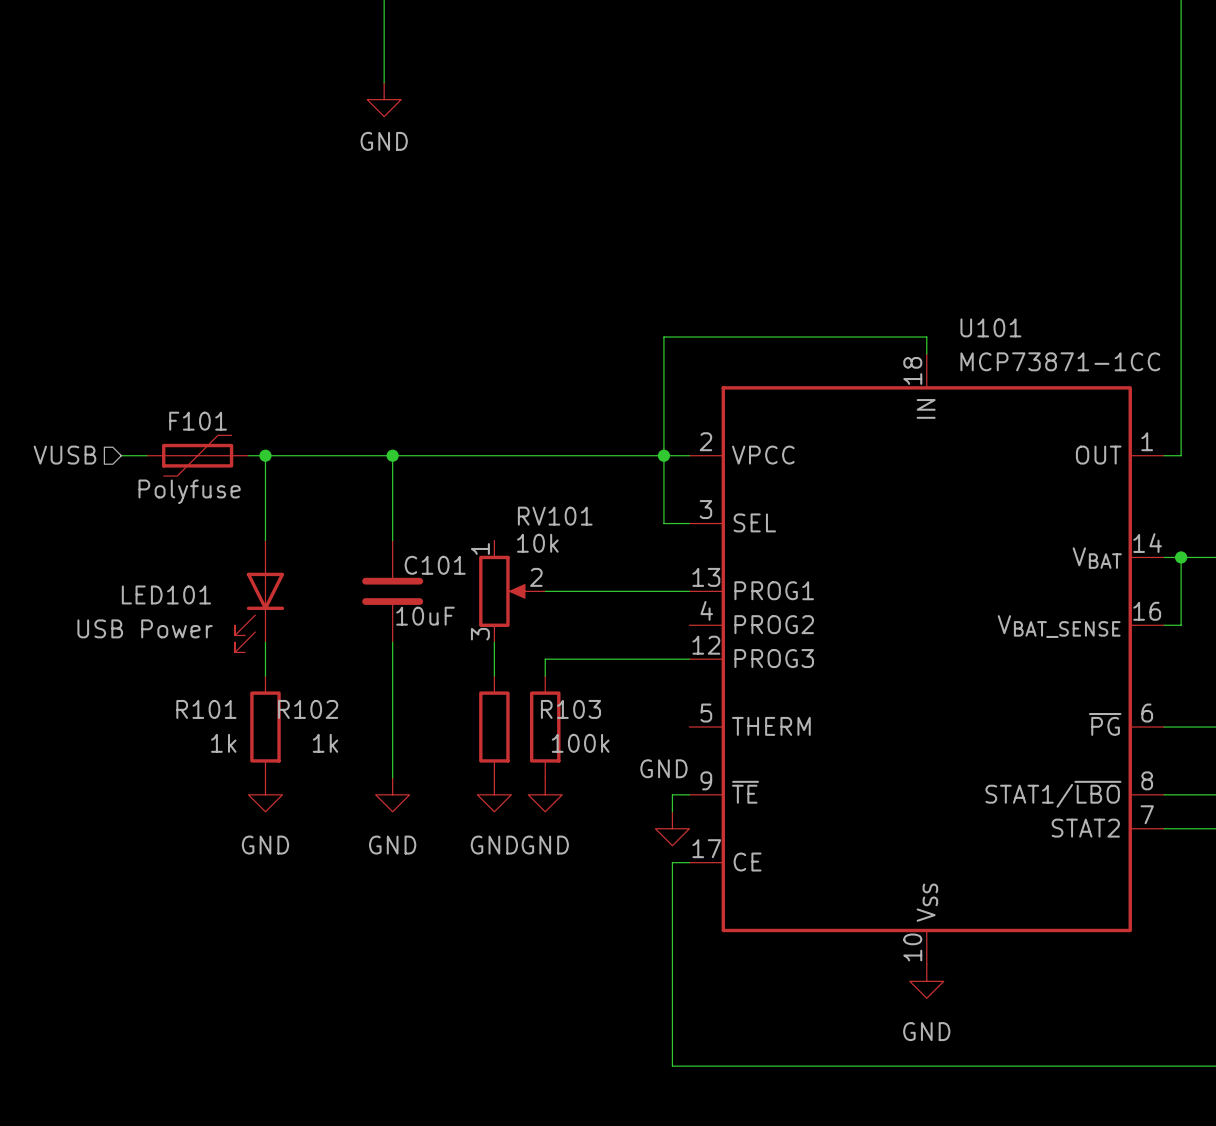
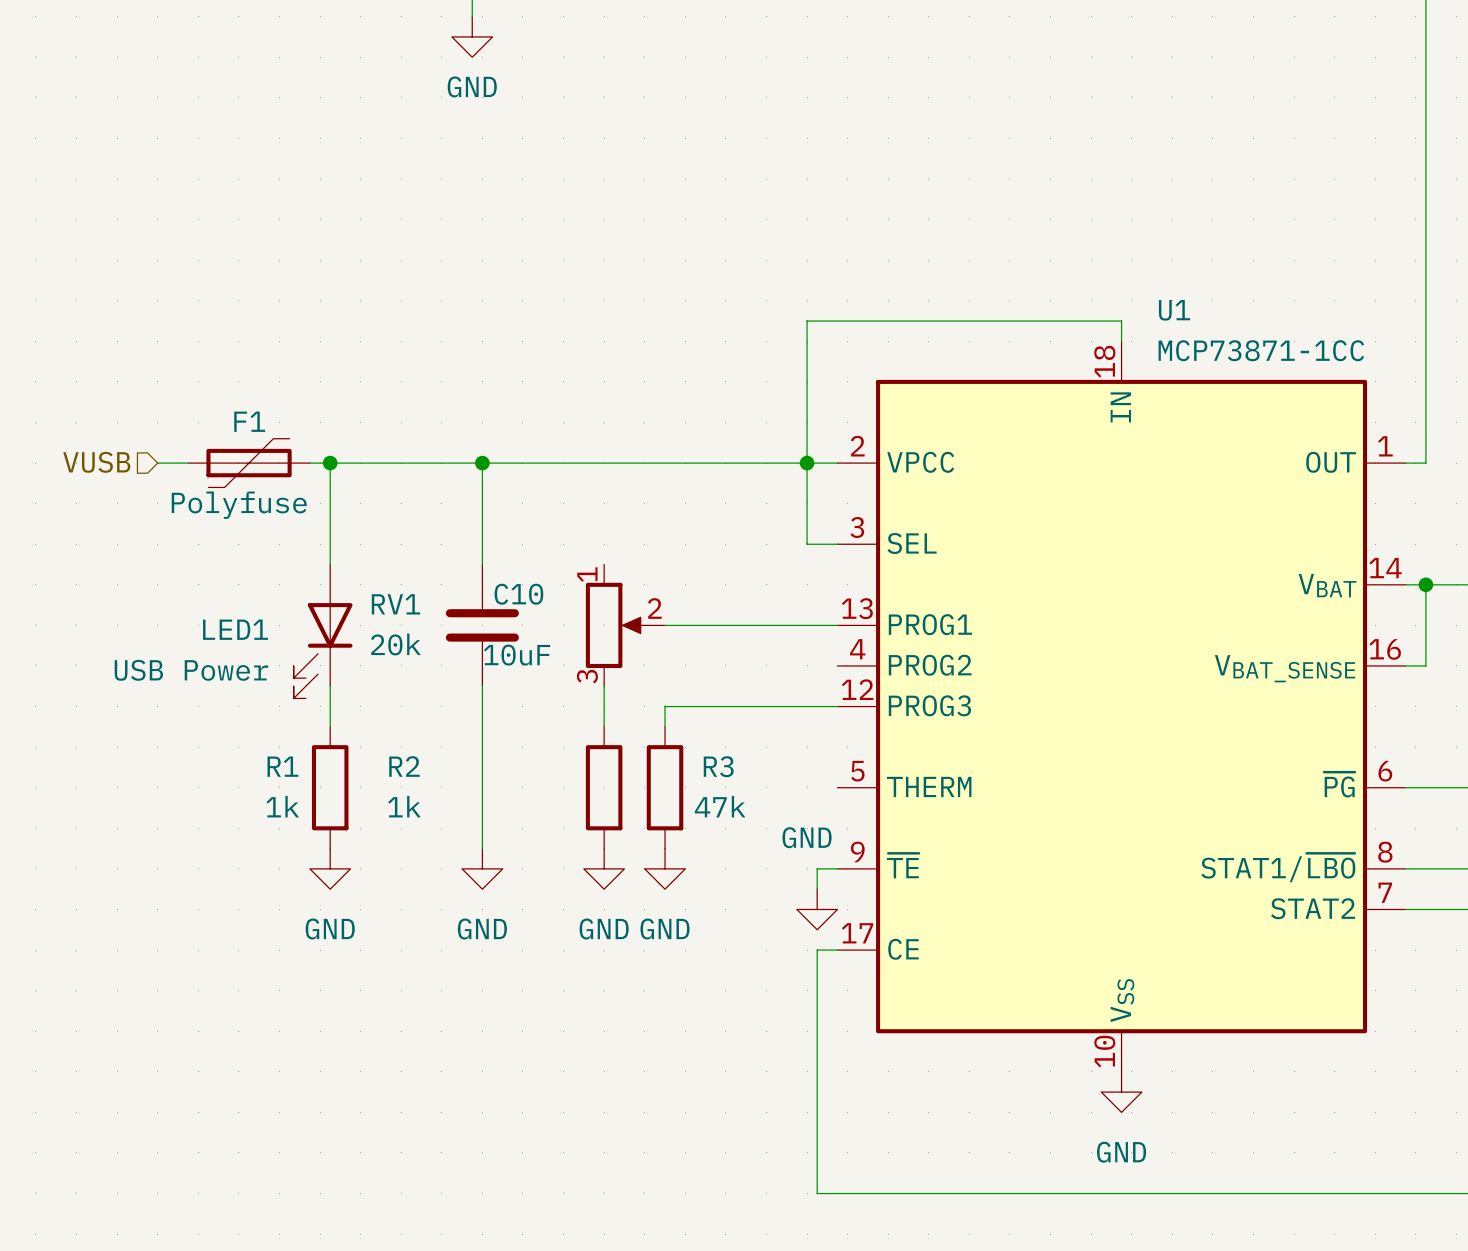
U101 name: U101 (990, 327) -> U1 (1174, 310)
F101 name: F101 (198, 421) -> F1 (249, 421)
RV101 name: RV101 (555, 516) -> RV1 (395, 604)
RV101 value: 10k (537, 543) -> 20k (395, 644)
C101 name: C101 (435, 565) -> C10 (518, 594)
LED101 name: LED101 (166, 594) -> LED1 (235, 629)
R101 name: R101 (206, 709) -> R1 (282, 766)
R102 name: R102 (308, 709) -> R2 (404, 766)
R103 name: R103 (570, 709) -> R3 (718, 766)
R103 value: 100k (580, 743) -> 47k (720, 806)

